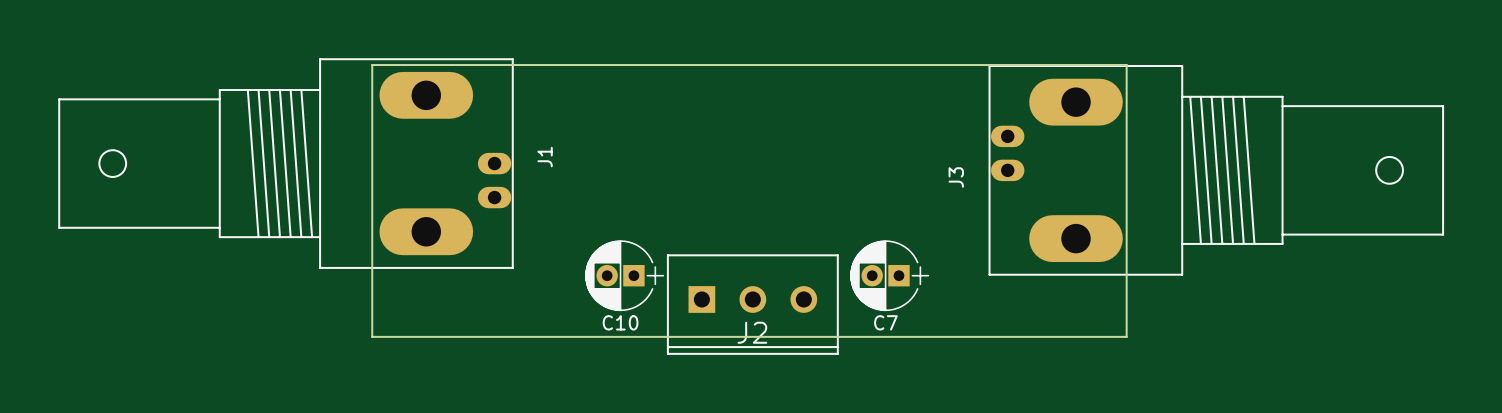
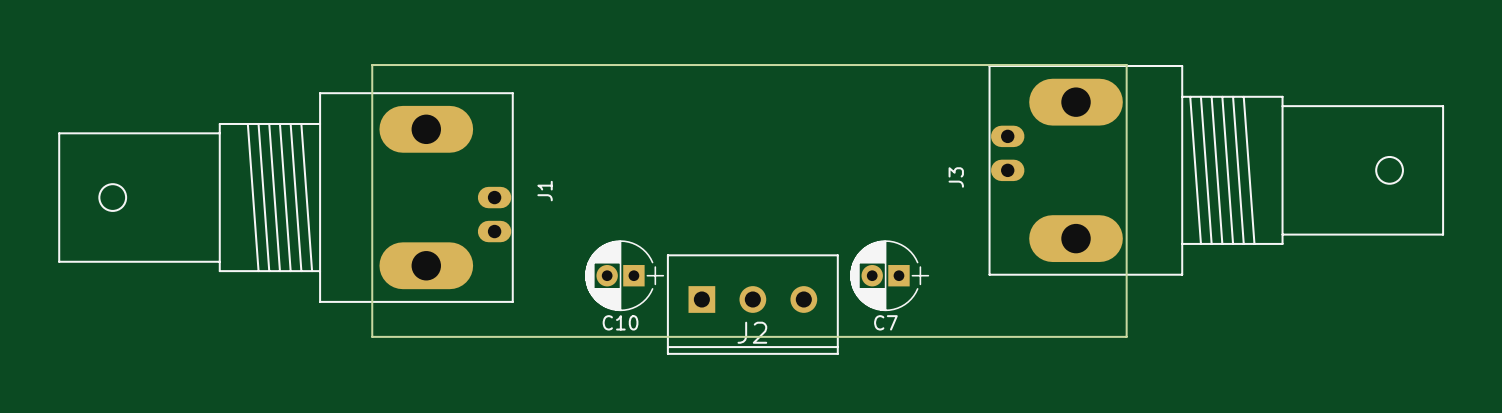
J1 position: (285, 163) -> (285, 197)

